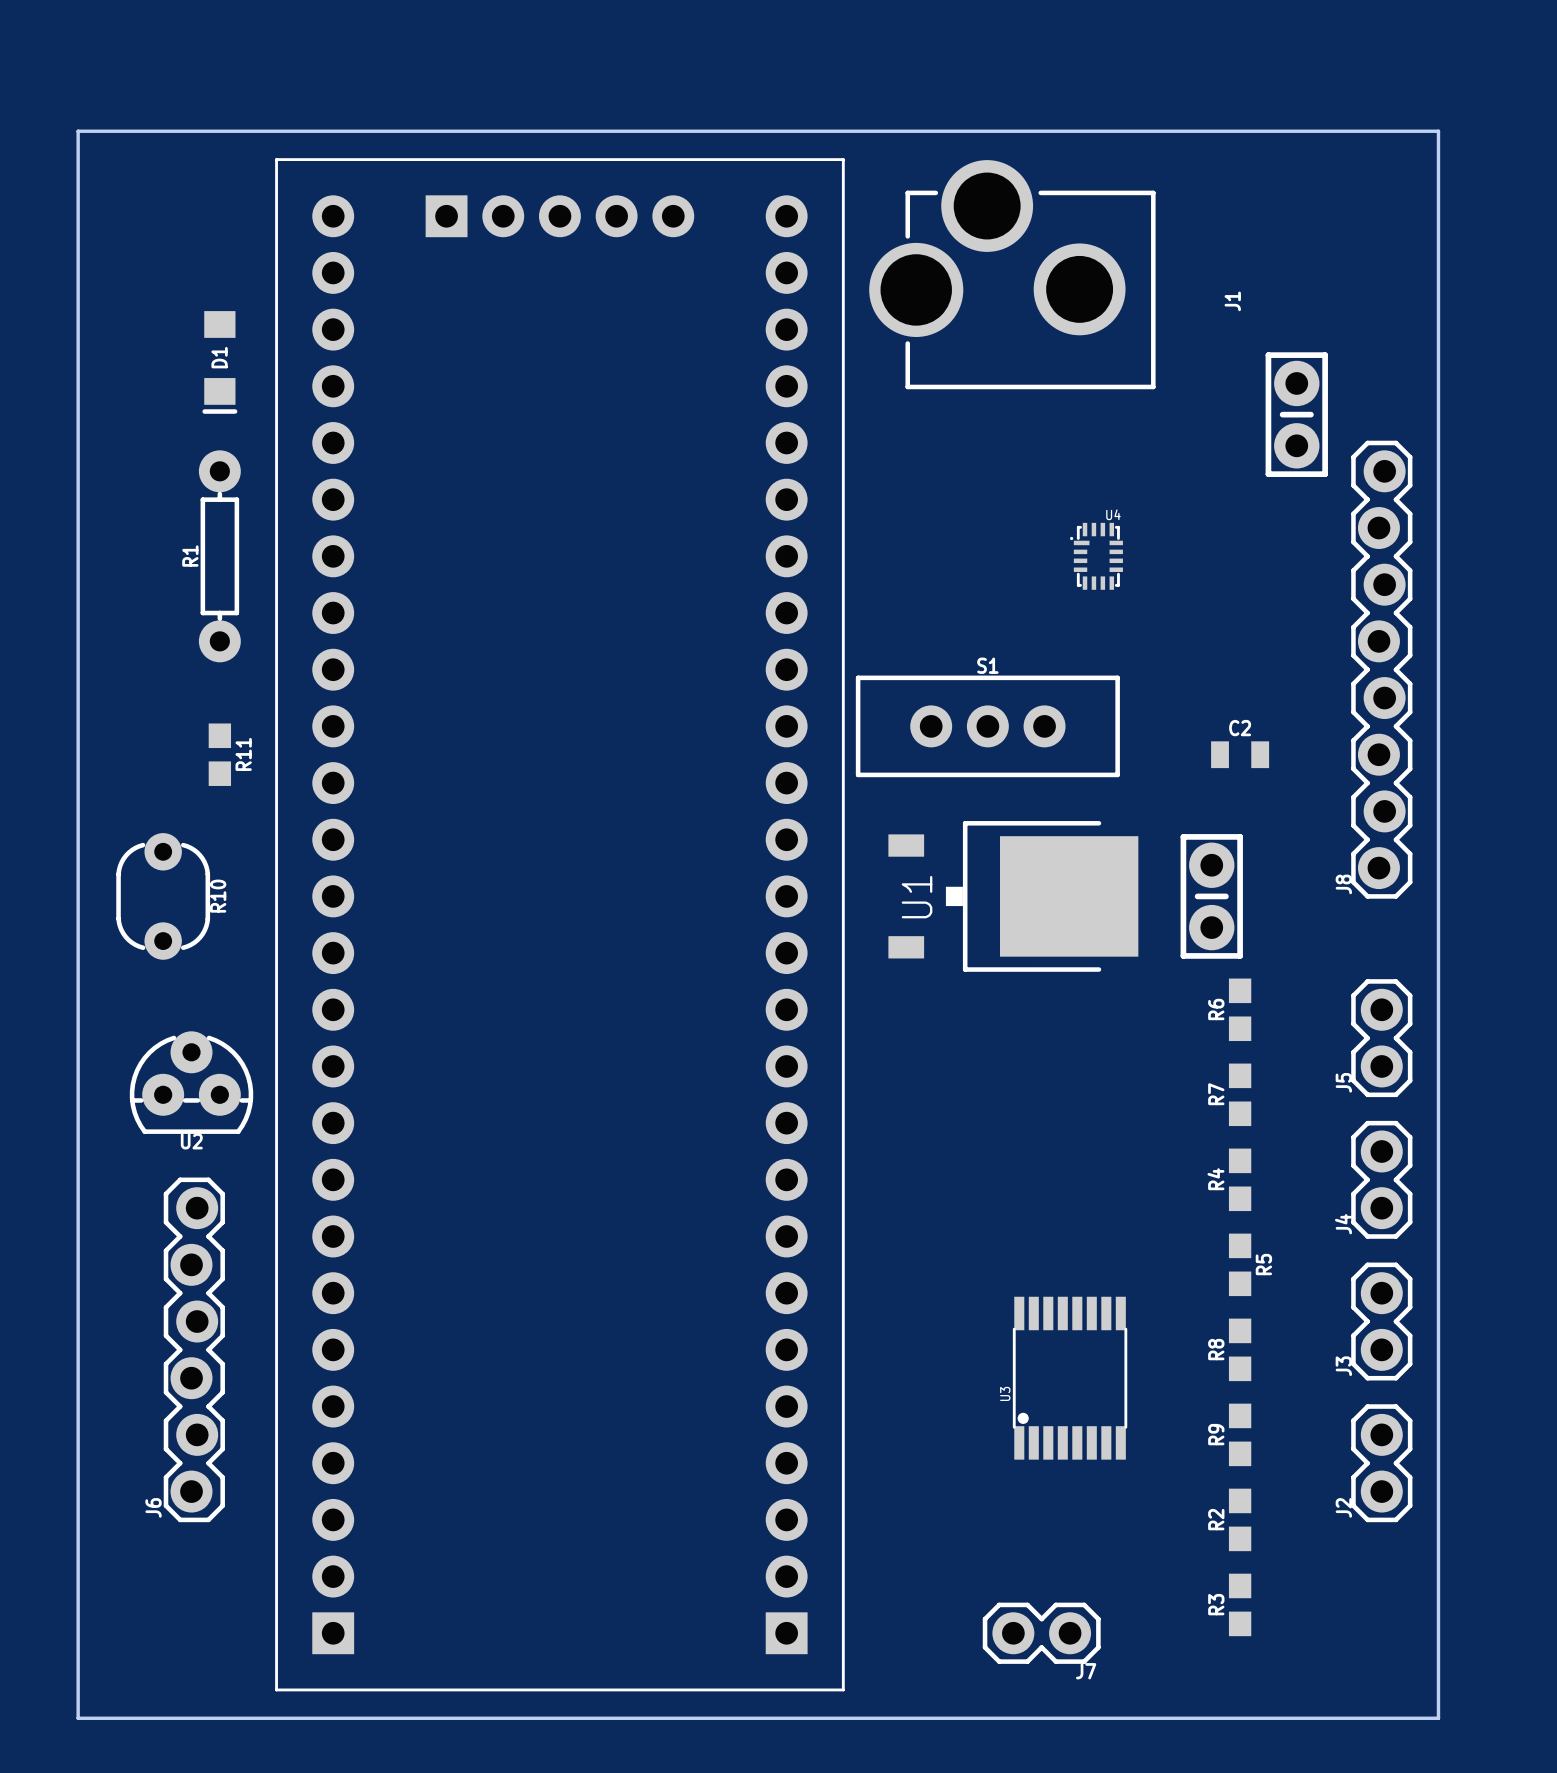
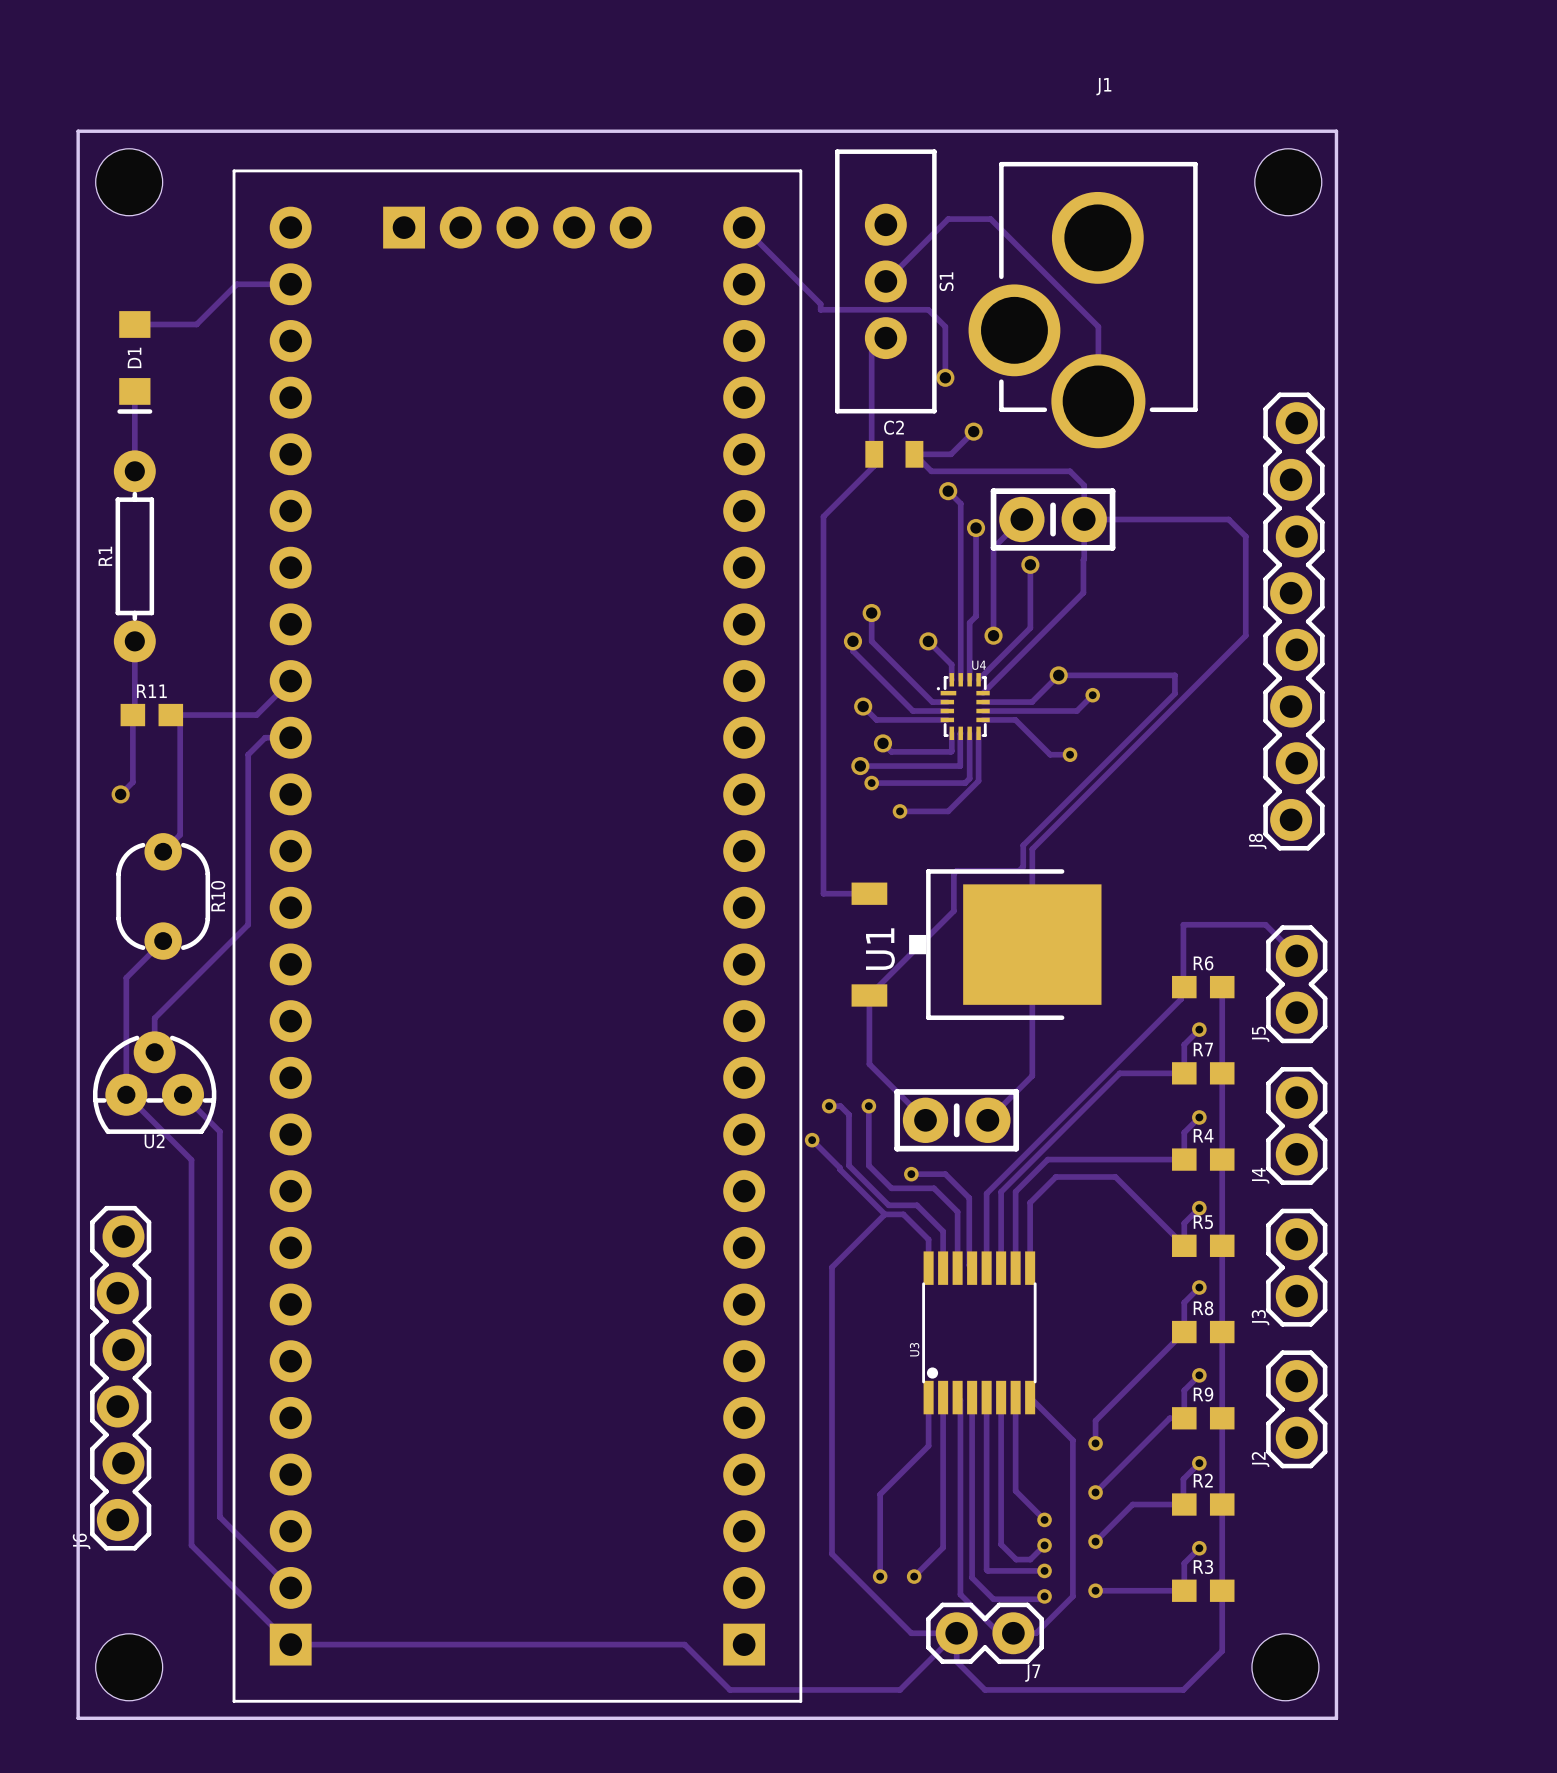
board edge: (1336, 131) (1438, 131) (1438, 1718) (1336, 1718) -> (1336, 131) (1336, 1718)
hole: none -> (129, 182)
hole: none -> (1288, 182)
track: none -> (744, 227) (820, 304) (820, 309) (928, 309) (945, 326) (945, 377)
J1 rotation: 0° (1012, 274) -> 90° counterclockwise (1083, 305)
track: none -> (885, 281) (948, 219) (990, 219) (1098, 326) (1098, 401)
track: none -> (290, 284) (236, 284) (196, 324) (134, 324)
track: none -> (885, 338) (871, 352) (871, 451) (874, 454) (874, 465) (823, 516) (823, 893) (869, 893)
D1 position: (219, 362) -> (134, 362)
via: none -> (945, 377)
track: none -> (134, 391) (134, 471)
part: (1296, 414) -> none
track: none -> (973, 431) (951, 454) (914, 454) (931, 471) (1070, 471) (1084, 485) (1083, 592) (983, 693)
via: none -> (973, 431)
track: none -> (948, 491) (960, 503) (960, 679)
via: none -> (948, 491)
track: none -> (1021, 519) (993, 547) (993, 635)
part: none -> (1053, 519)
track: none -> (1084, 519) (1228, 519) (1245, 536) (1245, 635) (1032, 849) (1032, 1075) (987, 1120)
track: none -> (976, 528) (976, 616) (969, 622) (969, 679)
via: none -> (976, 528)
R1 position: (219, 556) -> (134, 556)
U4 position: (1096, 556) -> (963, 706)
track: none -> (1030, 564) (1030, 627) (978, 679)
via: none -> (1030, 564)
track: none -> (871, 613) (871, 641) (932, 702) (947, 702)
via: none -> (871, 613)
via: none -> (993, 635)
track: none -> (134, 641) (132, 782) (120, 794)
track: none -> (852, 641) (852, 651) (912, 711) (947, 711)
via: none -> (852, 641)
track: none -> (928, 641) (951, 664) (951, 679)
via: none -> (928, 641)
J8 position: (1381, 669) -> (1293, 621)
via: none -> (1058, 675)
track: none -> (290, 681) (256, 715) (170, 715) (180, 724) (180, 834) (163, 851)
track: none -> (1092, 695) (1076, 711) (983, 711)
via: none -> (1092, 695)
track: none -> (983, 702) (1032, 702) (1058, 675) (1174, 675) (1174, 693) (1023, 845) (1023, 866) (1019, 870) (956, 870) (953, 873) (953, 911) (869, 995) (869, 1064) (925, 1120)
track: none -> (863, 706) (876, 719) (947, 719)
via: none -> (863, 706)
track: none -> (983, 719) (1015, 719) (1050, 754) (1070, 754)
S1 rotation: 0° (987, 726) -> 90° clockwise (885, 281)
S1 position: (987, 726) -> (885, 281)
track: none -> (951, 733) (951, 751) (891, 751) (883, 743)
track: none -> (960, 733) (960, 766) (860, 766)
track: none -> (969, 733) (969, 778) (965, 783) (871, 783)
track: none -> (978, 733) (978, 781) (948, 811) (900, 811)
track: none -> (290, 737) (265, 737) (248, 754) (248, 924) (154, 1018) (154, 1052)
via: none -> (883, 743)
R11 rotation: 0° (219, 754) -> 90° clockwise (151, 715)
R11 position: (219, 754) -> (151, 715)
via: none -> (1070, 754)
C2 position: (1240, 754) -> (894, 454)
via: none -> (860, 766)
via: none -> (871, 783)
via: none -> (120, 794)
via: none -> (900, 811)
U1 position: (1013, 896) -> (976, 944)
part: (1211, 896) -> none
part position: (559, 924) -> (517, 936)
track: none -> (163, 941) (126, 977) (126, 1094) (191, 1159) (191, 1545) (290, 1644) (684, 1644) (729, 1689) (900, 1689) (956, 1633)
track: none -> (1296, 955) (1265, 924) (1183, 924) (1184, 987) (1181, 990) (1181, 999) (986, 1193) (986, 1268)
track: none -> (1222, 987) (1222, 1651) (1183, 1689) (985, 1689) (956, 1661) (956, 1633)
R6 rotation: 0° (1240, 1009) -> 90° clockwise (1203, 987)
R6 position: (1240, 1009) -> (1203, 987)
track: none -> (1199, 1029) (1184, 1044) (1184, 1073) (1119, 1073) (1001, 1191) (1001, 1268)
via: none -> (1199, 1029)
U2 footprint: [129, 1031, 254, 1134] -> [92, 1031, 217, 1134]
J5 position: (1381, 1038) -> (1296, 984)
track: none -> (183, 1094) (219, 1131) (219, 1517) (290, 1587)
R7 rotation: 0° (1240, 1094) -> 90° clockwise (1203, 1073)
R7 position: (1240, 1094) -> (1203, 1073)
track: none -> (829, 1106) (840, 1106) (849, 1114) (849, 1165) (888, 1205) (917, 1205) (943, 1231) (943, 1268)
via: none -> (829, 1106)
track: none -> (868, 1106) (868, 1165) (891, 1188) (934, 1188) (957, 1211) (957, 1268)
via: none -> (868, 1106)
track: none -> (1199, 1117) (1184, 1132) (1184, 1159) (1047, 1159) (1015, 1191) (1015, 1268)
via: none -> (1199, 1117)
part: none -> (956, 1120)
track: none -> (812, 1140) (884, 1214)
via: none -> (812, 1140)
track: none -> (911, 1174) (945, 1174) (969, 1198) (969, 1265) (972, 1268)
via: none -> (911, 1174)
R4 rotation: 0° (1240, 1179) -> 90° clockwise (1203, 1159)
R4 position: (1240, 1179) -> (1203, 1159)
J4 position: (1381, 1179) -> (1296, 1125)
track: none -> (1199, 1208) (1184, 1223) (1184, 1245) (1115, 1176) (1055, 1176) (1030, 1202) (1030, 1268)
via: none -> (1199, 1208)
track: none -> (884, 1214) (903, 1214) (928, 1239) (928, 1268)
track: none -> (884, 1214) (832, 1267) (832, 1553) (911, 1633) (956, 1633)
R5 rotation: 0° (1240, 1264) -> 90° clockwise (1203, 1245)
R5 position: (1240, 1264) -> (1203, 1245)
track: none -> (1199, 1287) (1184, 1302) (1184, 1332) (1095, 1420) (1095, 1443)
via: none -> (1199, 1287)
J3 position: (1381, 1321) -> (1296, 1267)
J6 position: (194, 1349) -> (120, 1378)
R8 rotation: 0° (1240, 1349) -> 90° clockwise (1203, 1332)
R8 position: (1240, 1349) -> (1203, 1332)
track: none -> (1199, 1375) (1184, 1390) (1184, 1418) (1169, 1418) (1095, 1492)
via: none -> (1199, 1375)
U3 position: (1070, 1378) -> (979, 1332)
track: none -> (928, 1397) (928, 1445) (880, 1494) (880, 1576)
track: none -> (943, 1397) (943, 1547) (914, 1576)
track: none -> (957, 1397) (960, 1400) (960, 1594) (999, 1633) (1036, 1633) (1072, 1596) (1072, 1440) (1030, 1397)
track: none -> (972, 1397) (972, 1577) (993, 1599) (1041, 1599) (1044, 1596)
track: none -> (986, 1397) (986, 1569) (1044, 1570)
track: none -> (1001, 1397) (1001, 1544) (1016, 1559) (1030, 1559) (1044, 1545)
track: none -> (1015, 1397) (1015, 1490) (1044, 1519)
R9 rotation: 0° (1240, 1434) -> 90° clockwise (1203, 1418)
R9 position: (1240, 1434) -> (1203, 1418)
via: none -> (1095, 1443)
track: none -> (1199, 1463) (1183, 1479) (1184, 1504) (1132, 1504) (1095, 1541)
via: none -> (1199, 1463)
J2 position: (1381, 1463) -> (1296, 1409)
via: none -> (1095, 1492)
via: none -> (1044, 1519)
R2 rotation: 0° (1240, 1519) -> 90° clockwise (1203, 1504)
R2 position: (1240, 1519) -> (1203, 1504)
via: none -> (1095, 1541)
via: none -> (1044, 1545)
track: none -> (1199, 1548) (1184, 1563) (1184, 1590) (1095, 1590)
via: none -> (1199, 1548)
via: none -> (1044, 1570)
via: none -> (880, 1576)
via: none -> (914, 1576)
via: none -> (1095, 1590)
via: none -> (1044, 1596)
R3 rotation: 0° (1240, 1604) -> 90° clockwise (1203, 1590)
R3 position: (1240, 1604) -> (1203, 1590)
J7 position: (1041, 1633) -> (985, 1633)
hole: none -> (129, 1667)
hole: none -> (1285, 1667)

